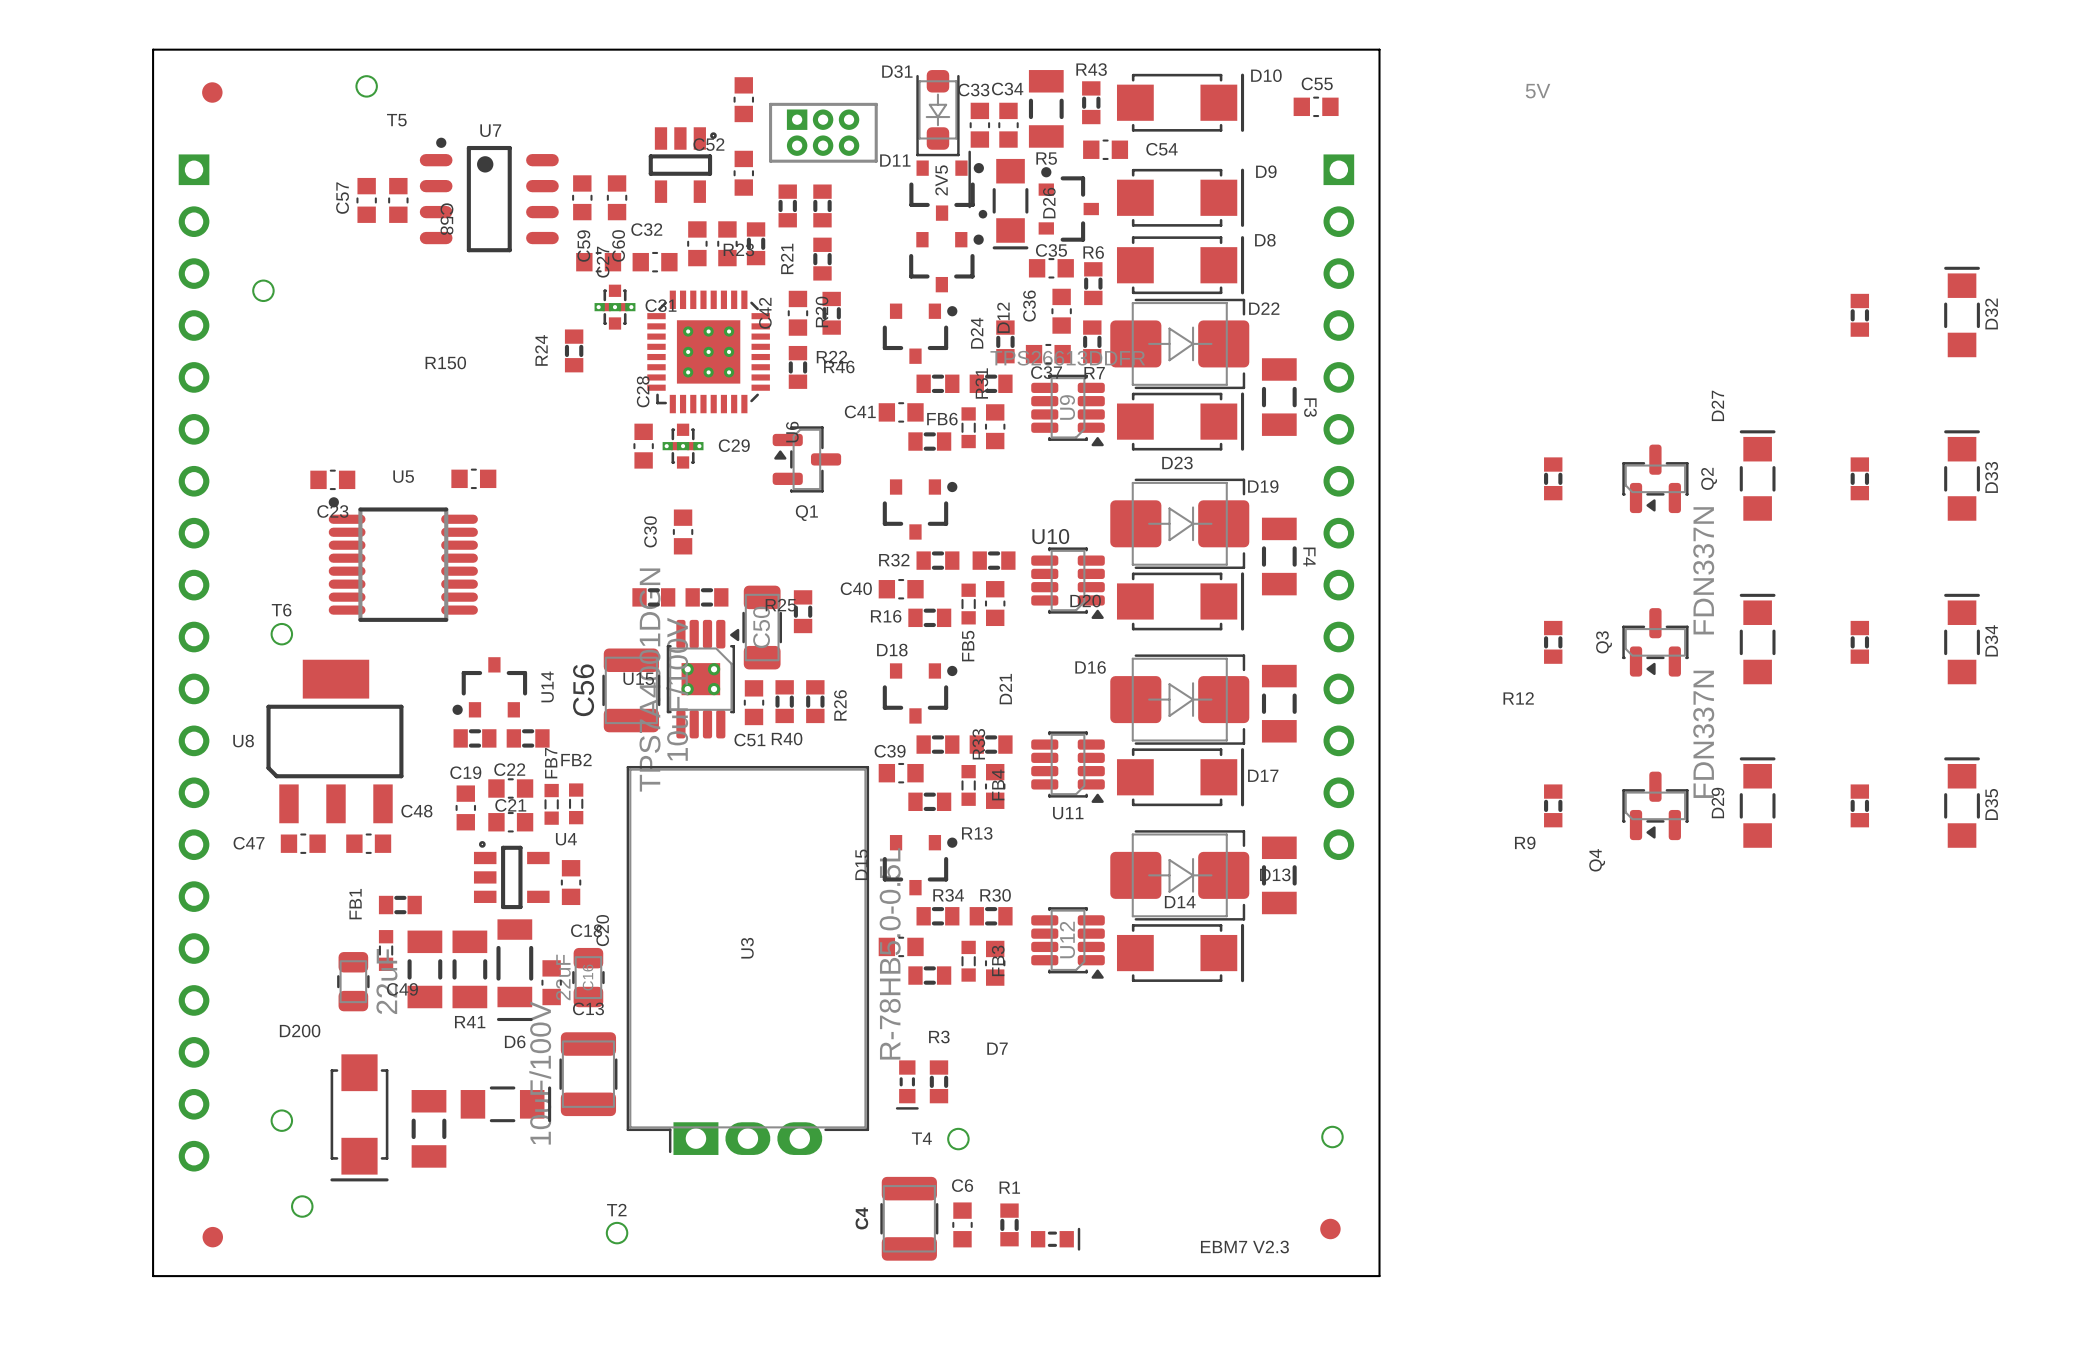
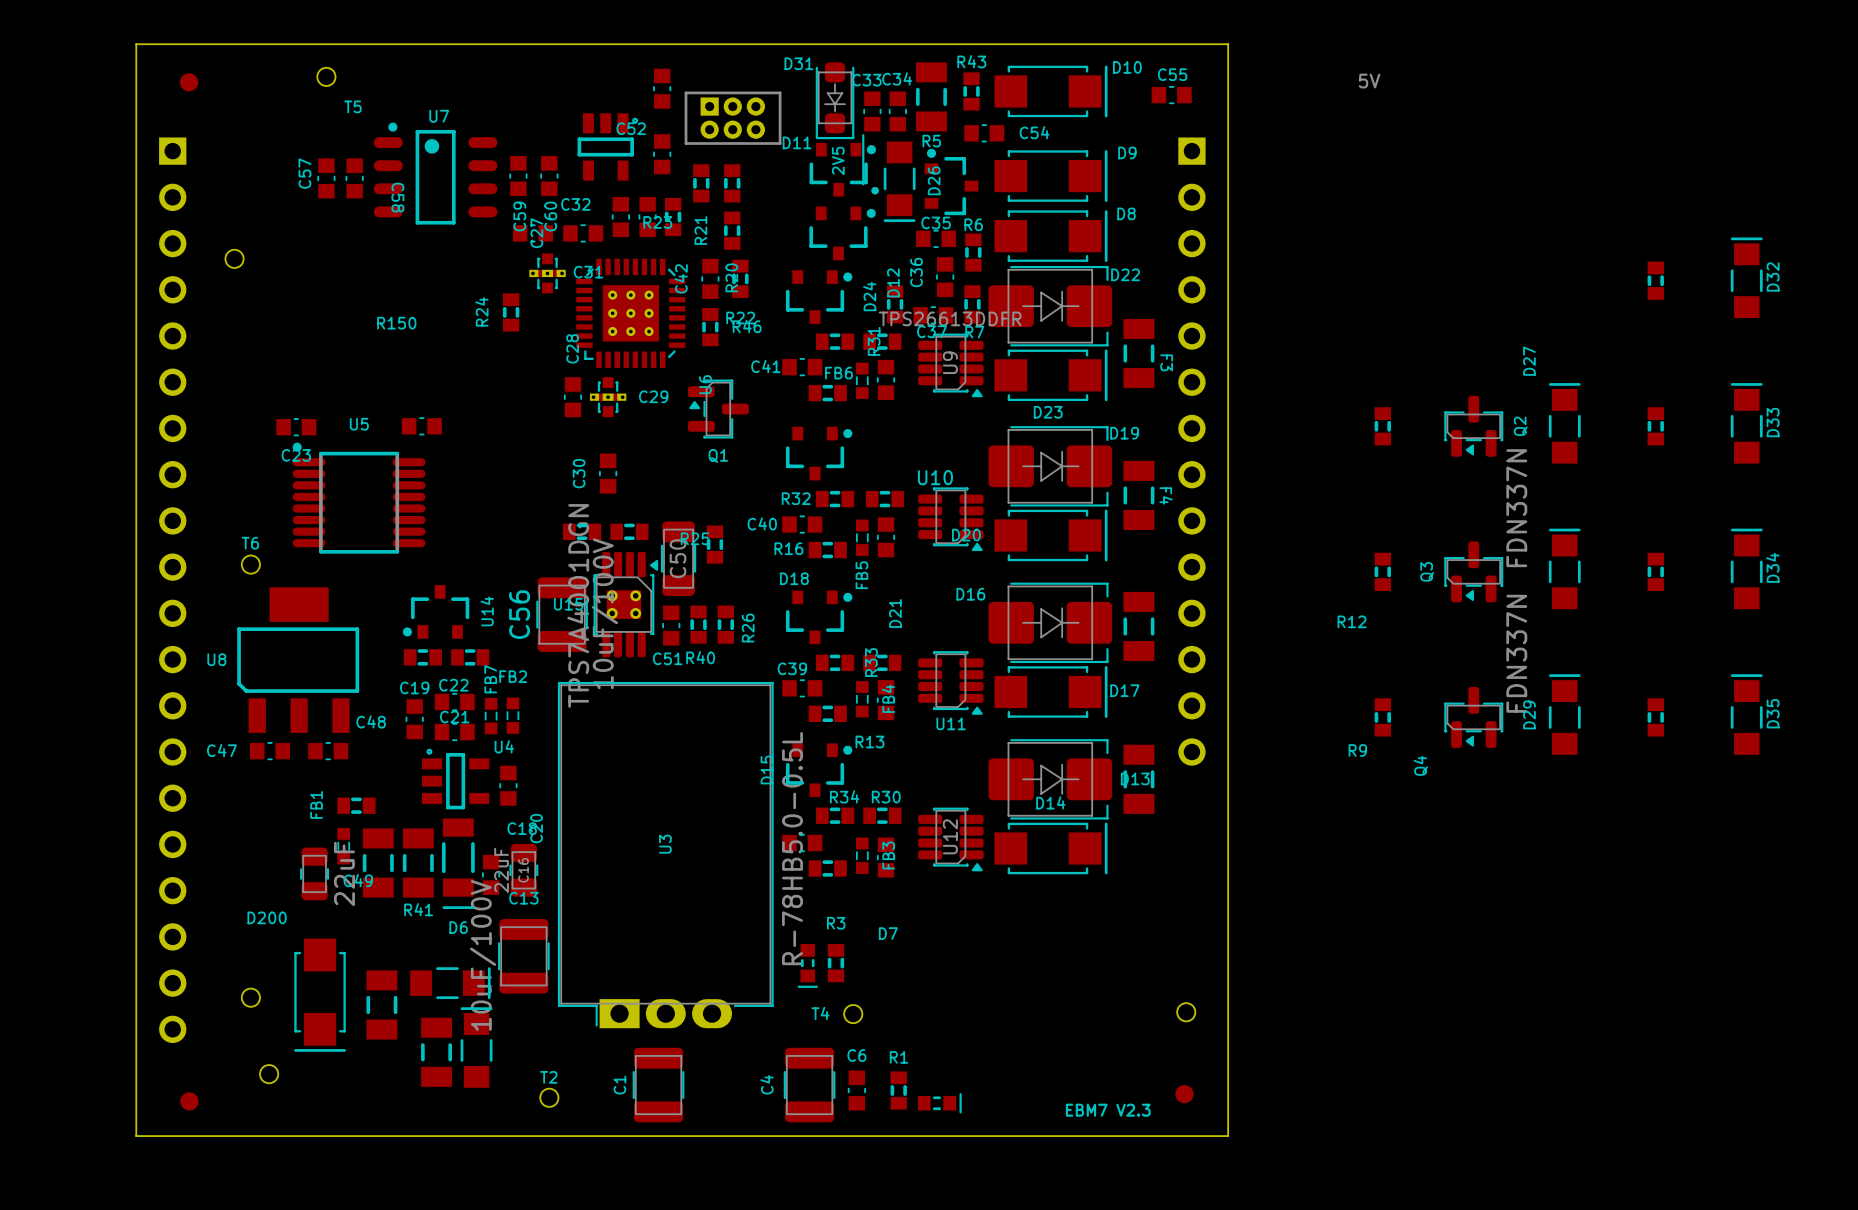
part: none -> (476, 1047)
part: none -> (436, 1052)
C1: none -> (658, 1085)

